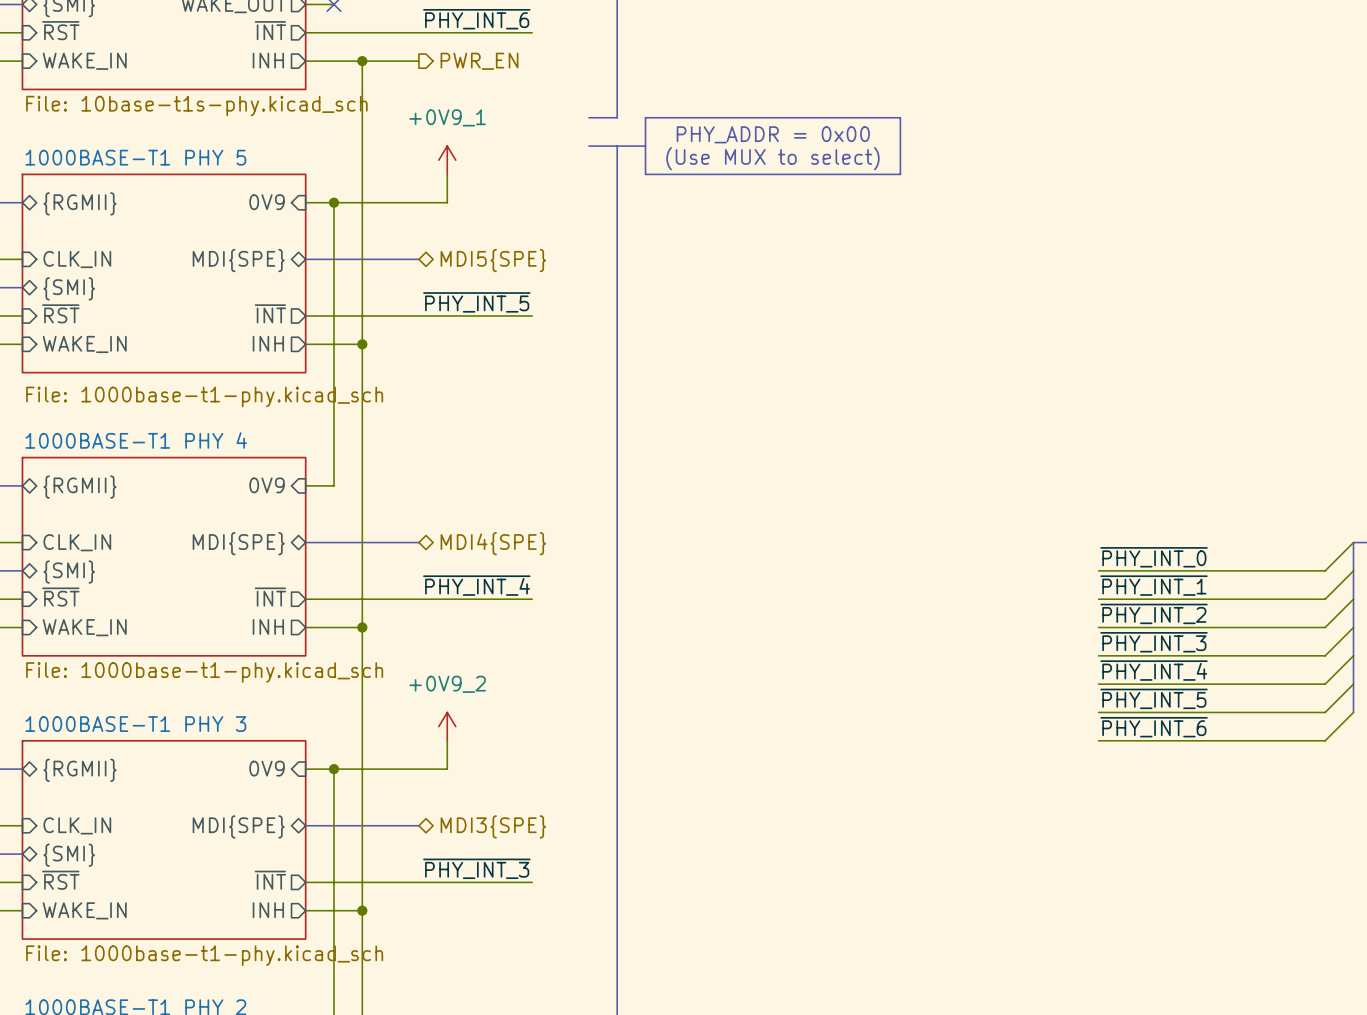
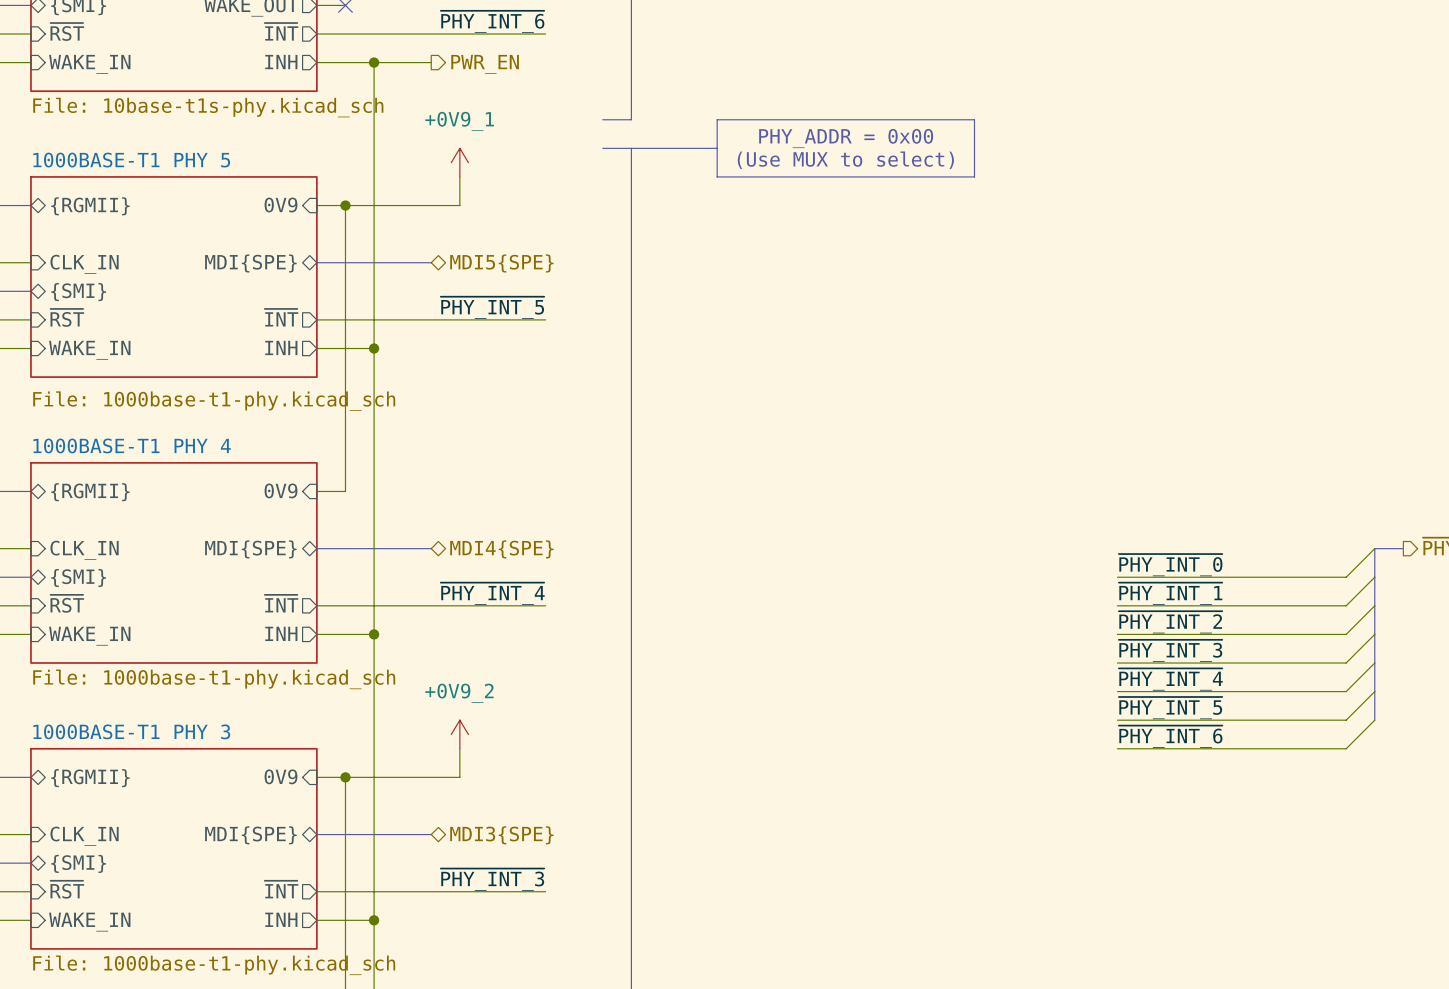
line: (702, 117) (645, 117) (645, 174) (702, 174) -> (717, 119) (717, 176)
line: (900, 117) (900, 174) -> (917, 119) (974, 119) (974, 176) (917, 176)
text position: PHY_ADDR = 0x00 (773, 134) -> PHY_ADDR = 0x00 (846, 138)
line: none -> (659, 148) (717, 148)
text position: (Use MUX to select) (772, 158) -> (Use MUX to select) (845, 160)

